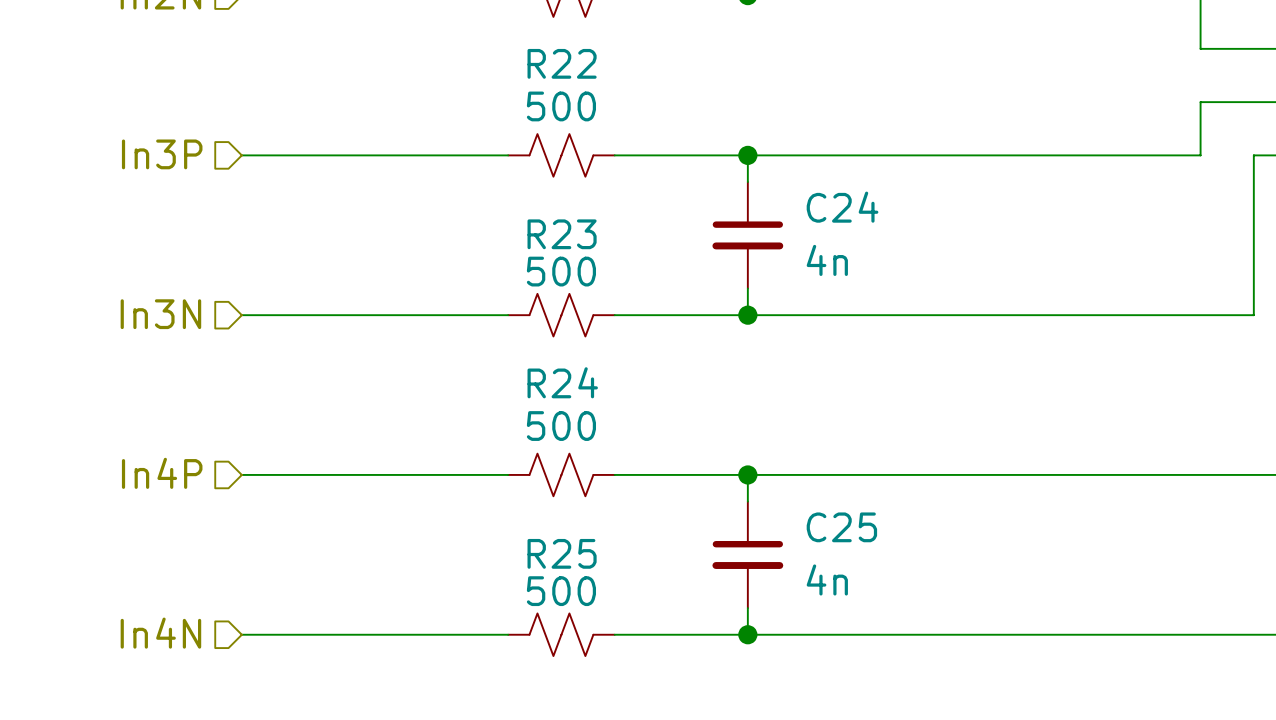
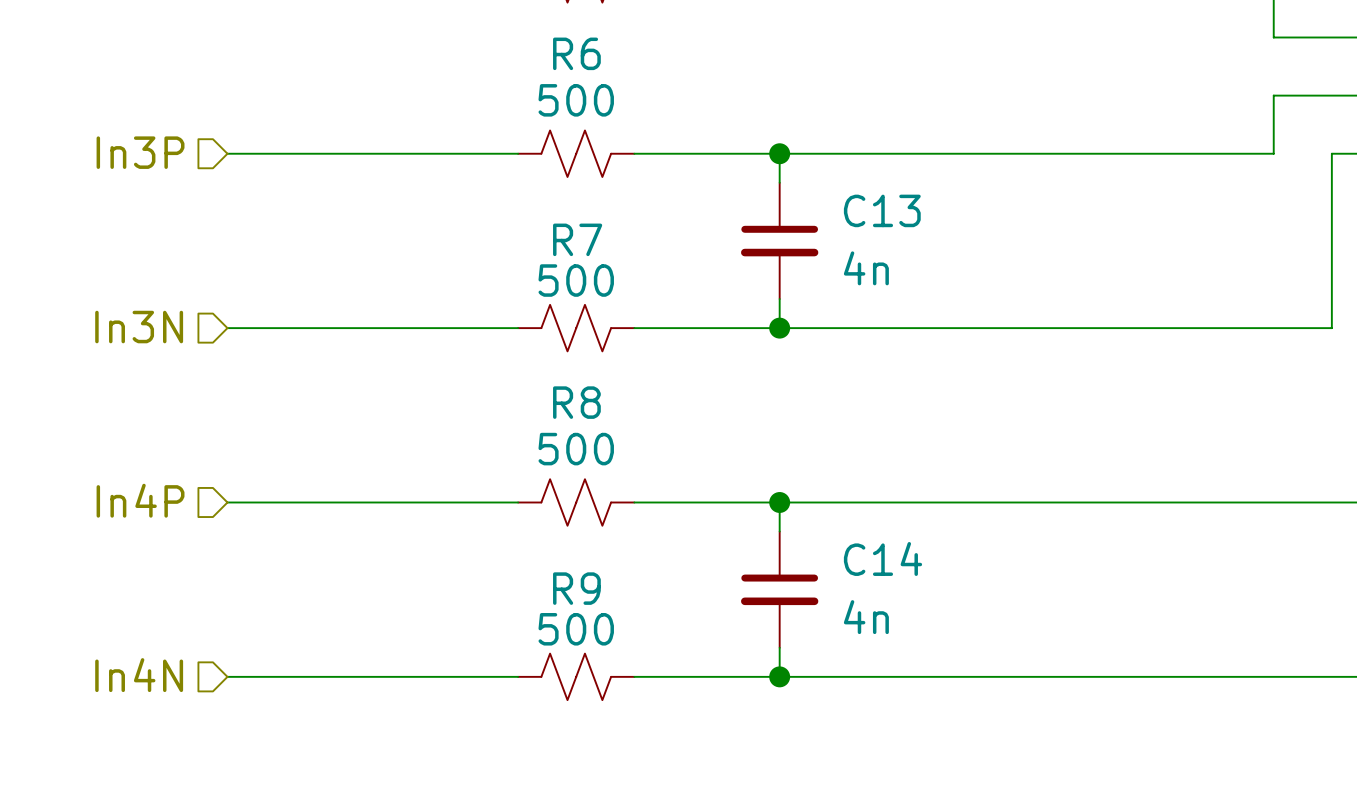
R22 name: R22 (562, 63) -> R6 (576, 53)
C24 name: C24 (842, 207) -> C13 (882, 210)
R23 name: R23 (562, 234) -> R7 (577, 239)
R24 name: R24 (562, 382) -> R8 (576, 402)
C25 name: C25 (841, 527) -> C14 (882, 558)
R25 name: R25 (562, 553) -> R9 (576, 588)

